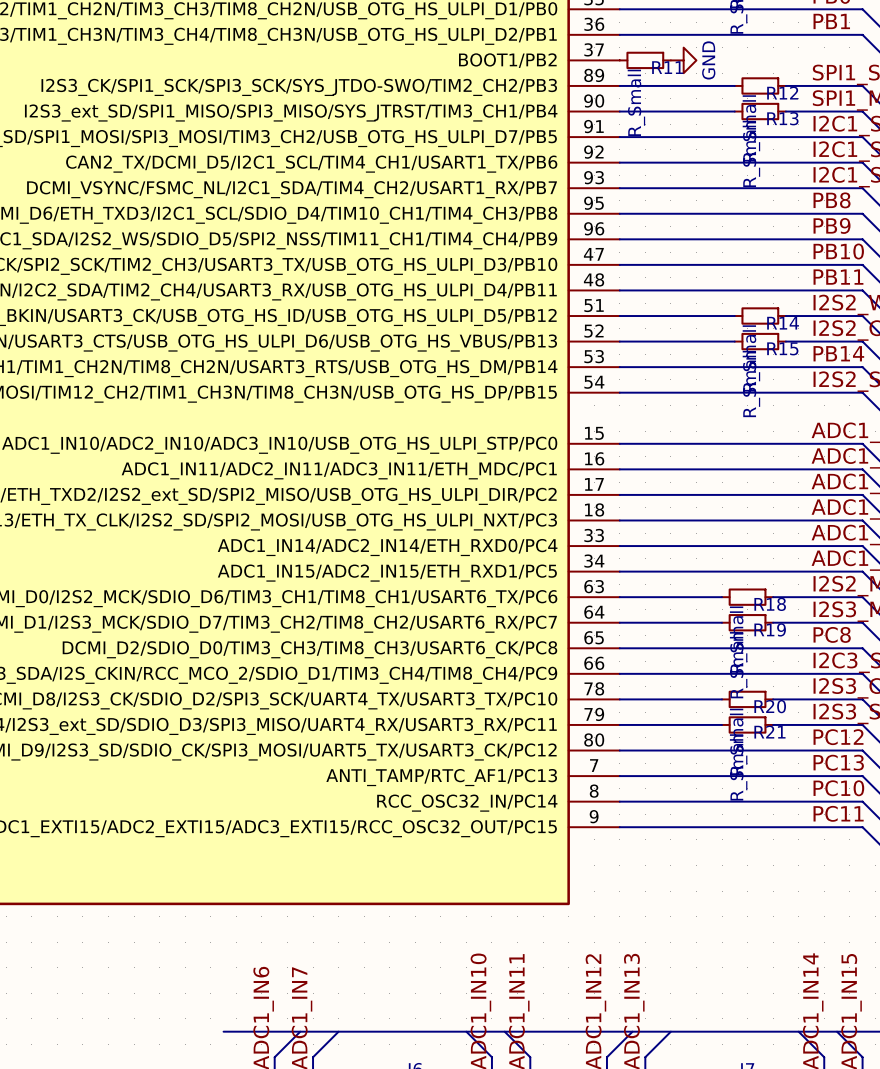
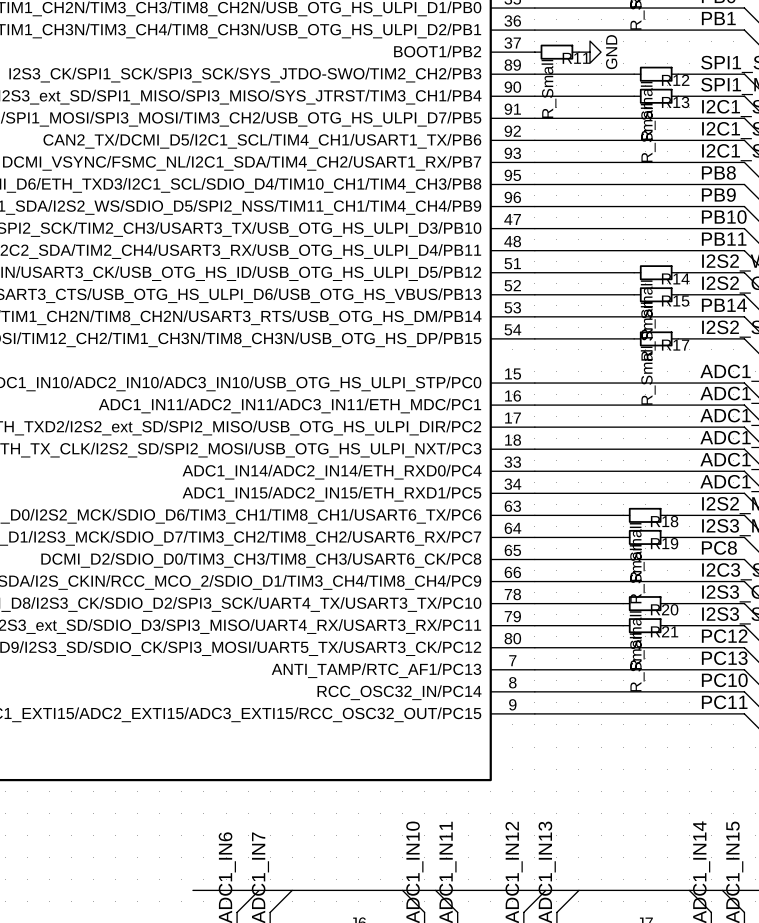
wire: (734, 392) (785, 392) -> none
R17: none -> R_Small (656, 338)

